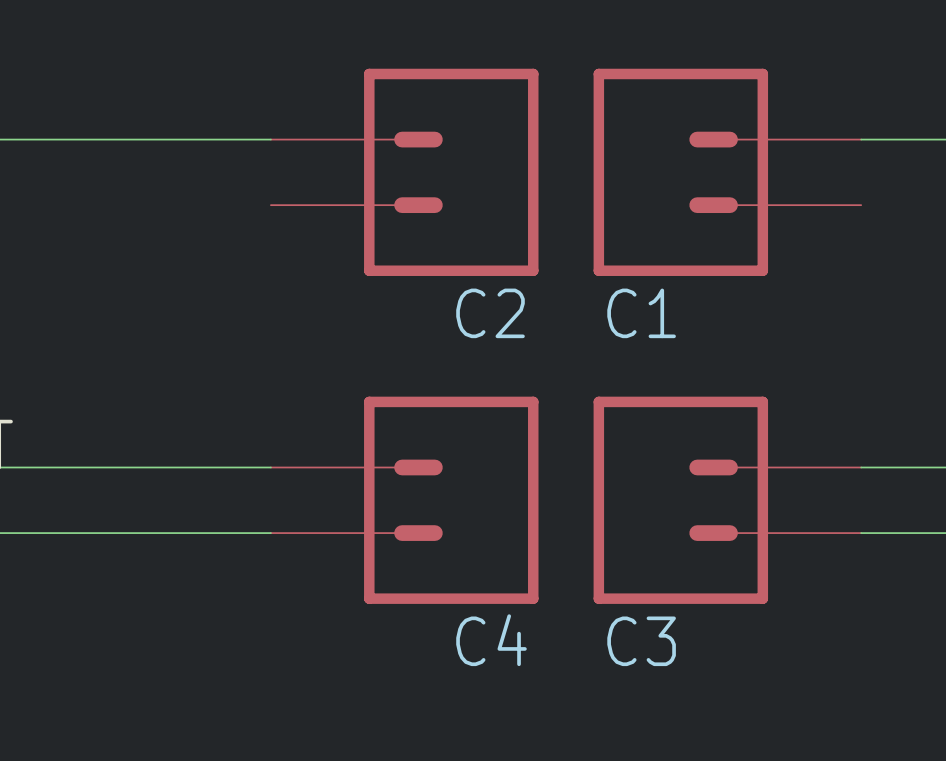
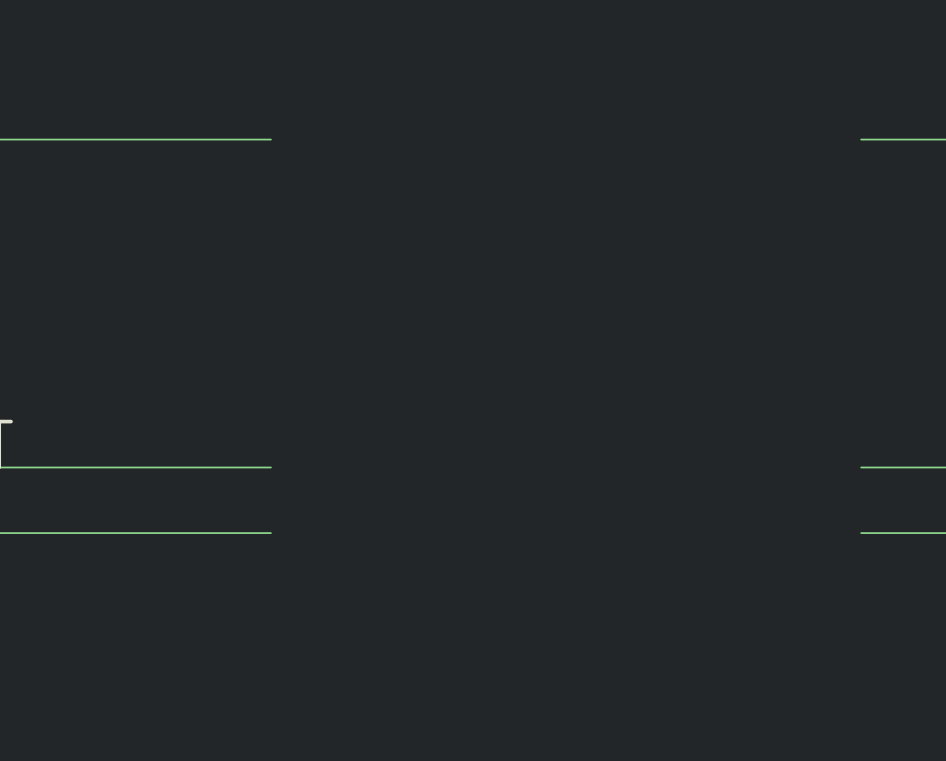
C2: (404, 172) -> none
C1: (727, 172) -> none
C4: (404, 500) -> none
C3: (727, 500) -> none

